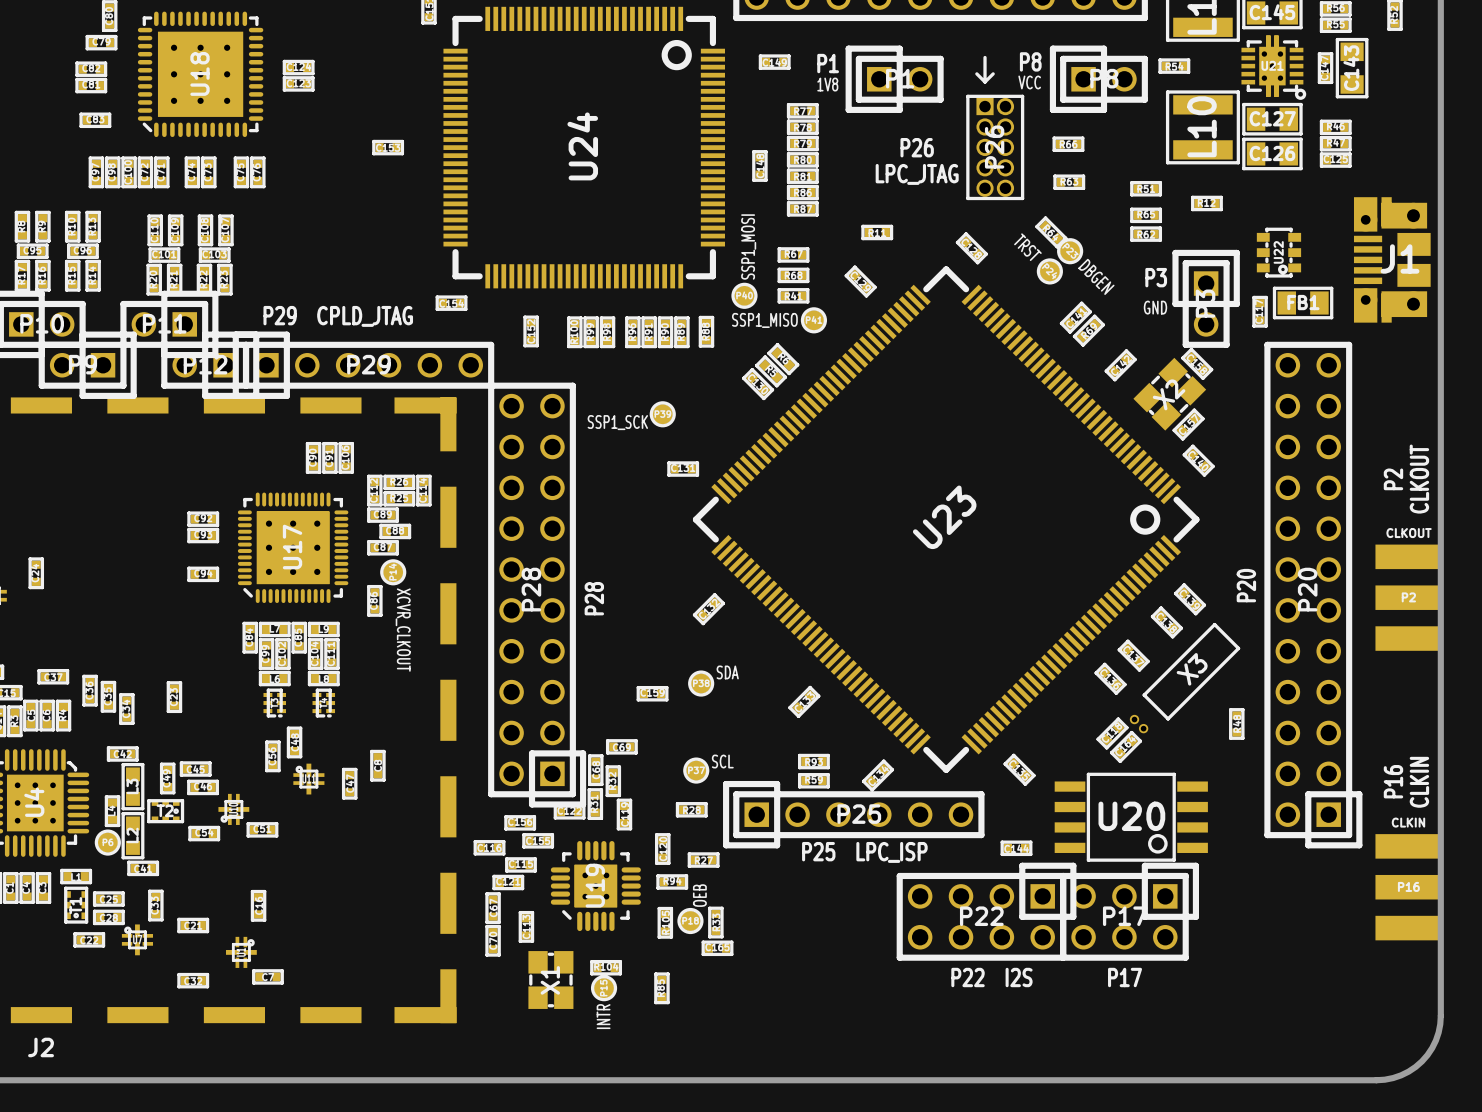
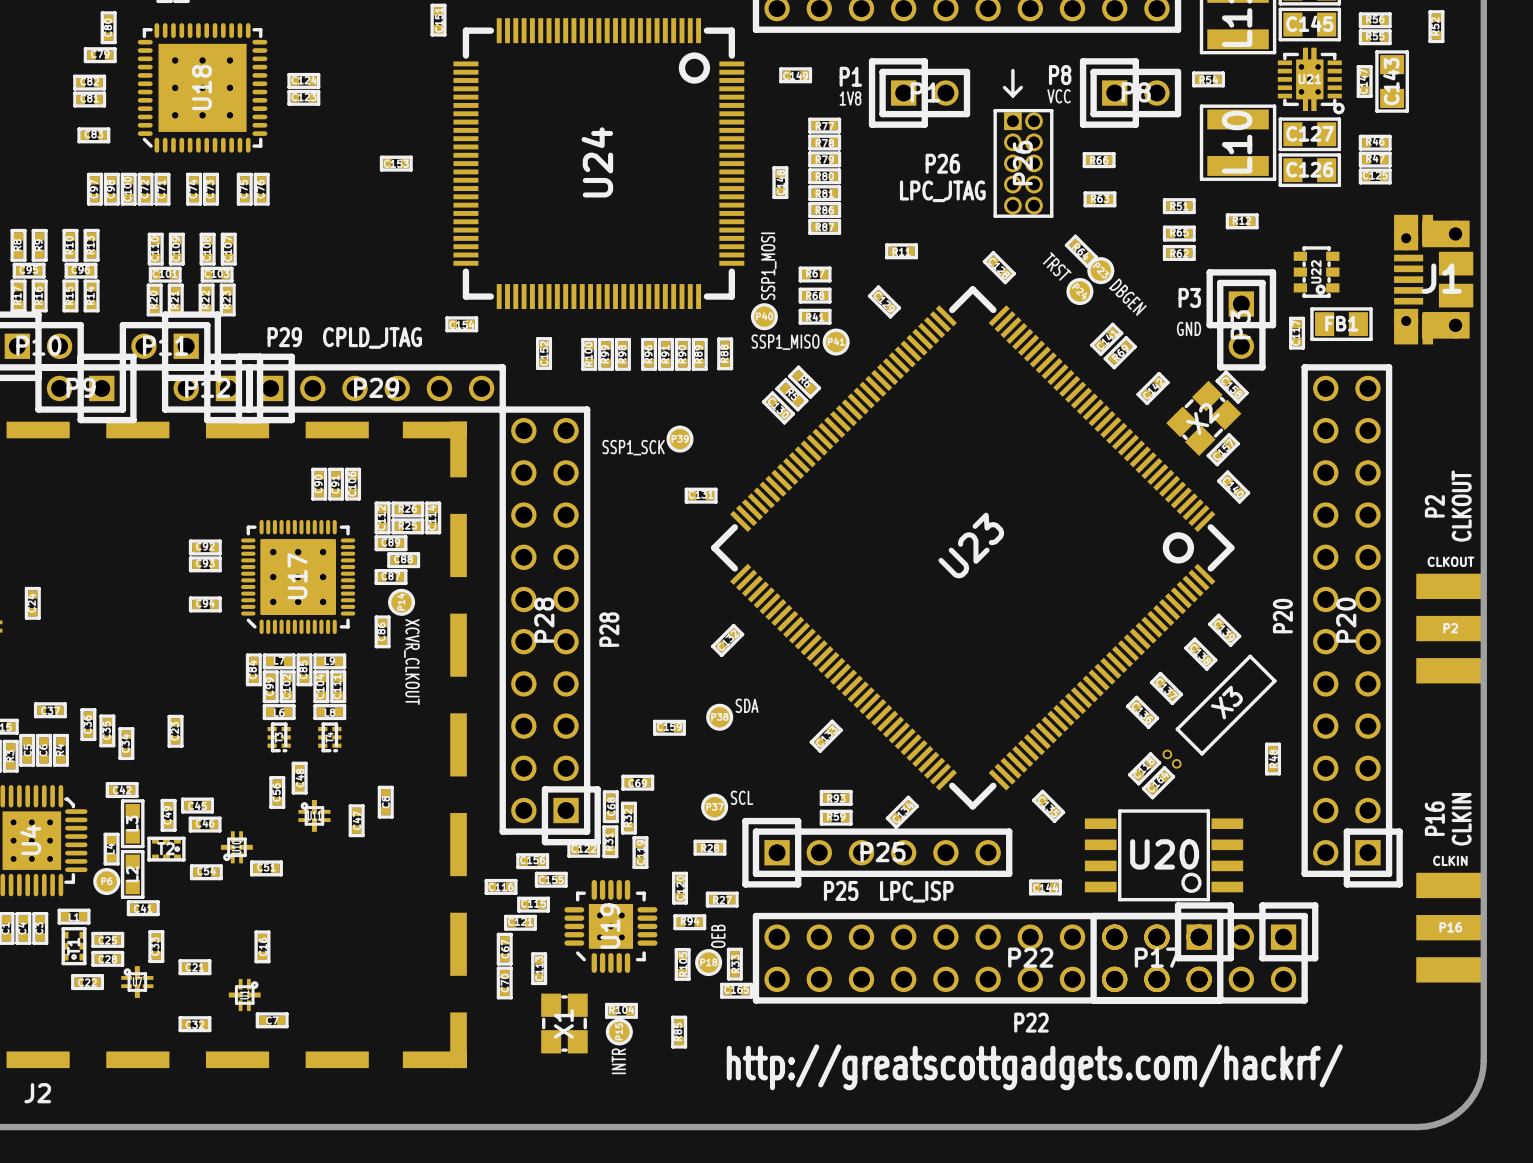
P22 footprint: [896, 862, 1077, 961] -> [752, 902, 1319, 1004]
text: P22 I2S (991, 977) -> P22 (1031, 1022)
text: P17 (1125, 977) -> none
text: none -> http://greatscottgadgets.com/hackrf/ (1034, 1067)

